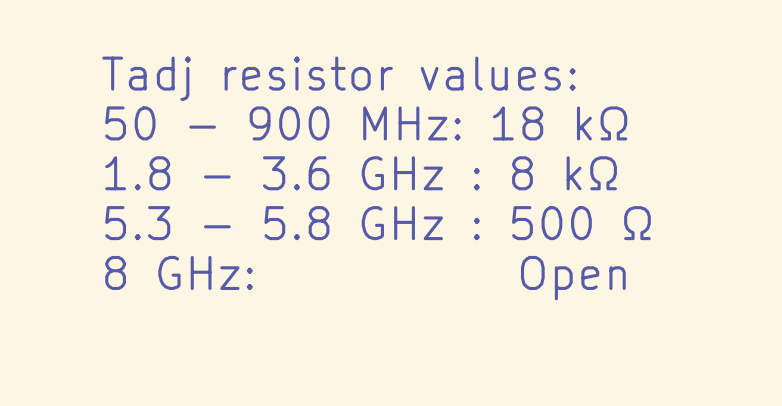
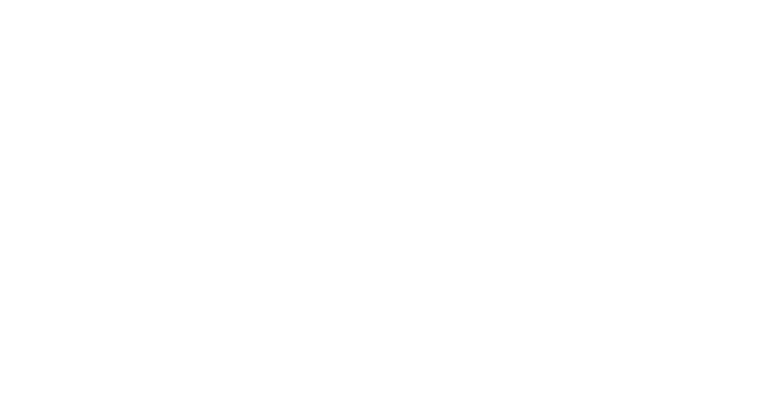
text: Tadj resistor values: (338, 78) -> none
text: 50 - 900 MHz: 18 kΩ (366, 123) -> none
text: 1.8 - 3.6 GHz : 8 kΩ (361, 173) -> none
text: 5.3 - 5.8 GHz : 500 Ω (378, 223) -> none
text: 8 GHz: Open (365, 278) -> none

